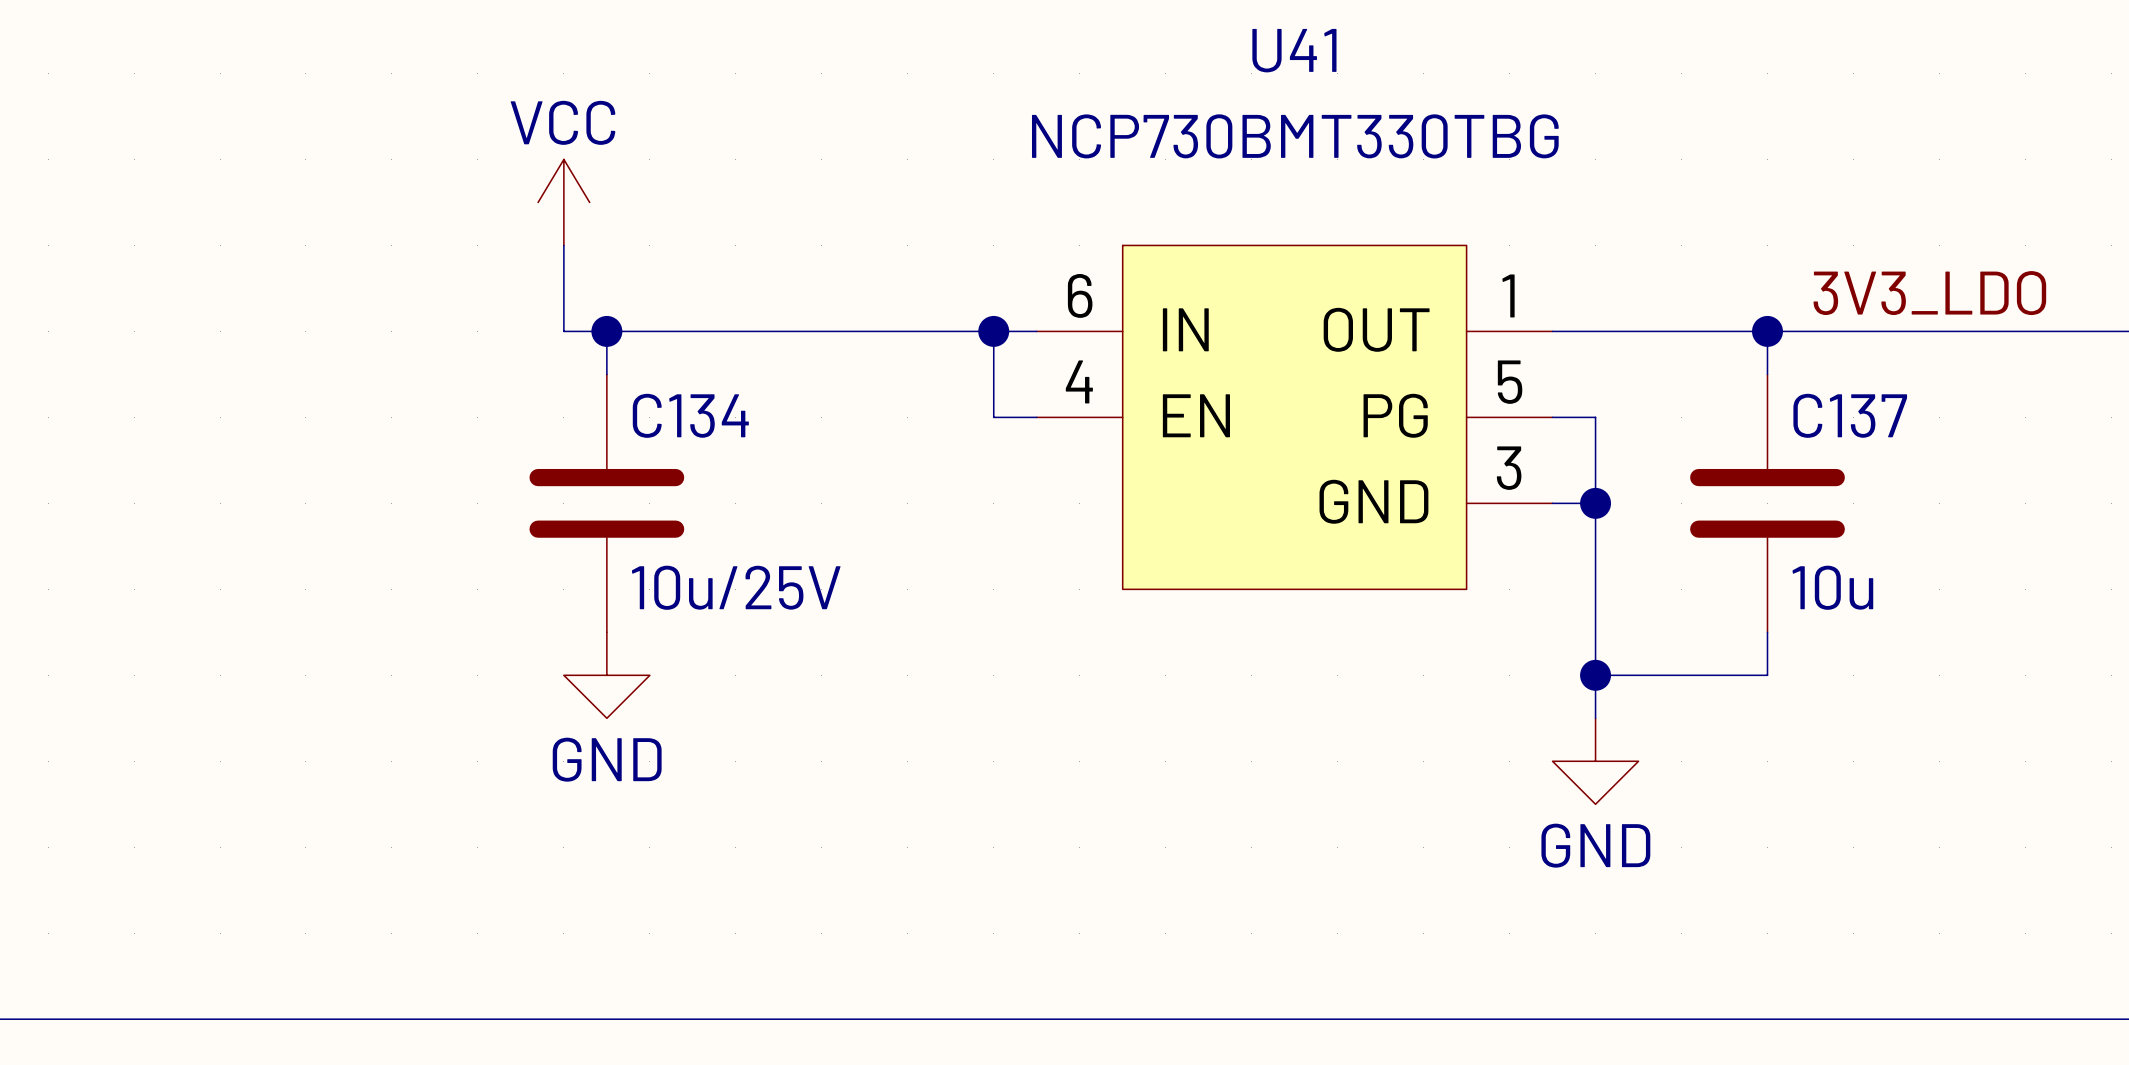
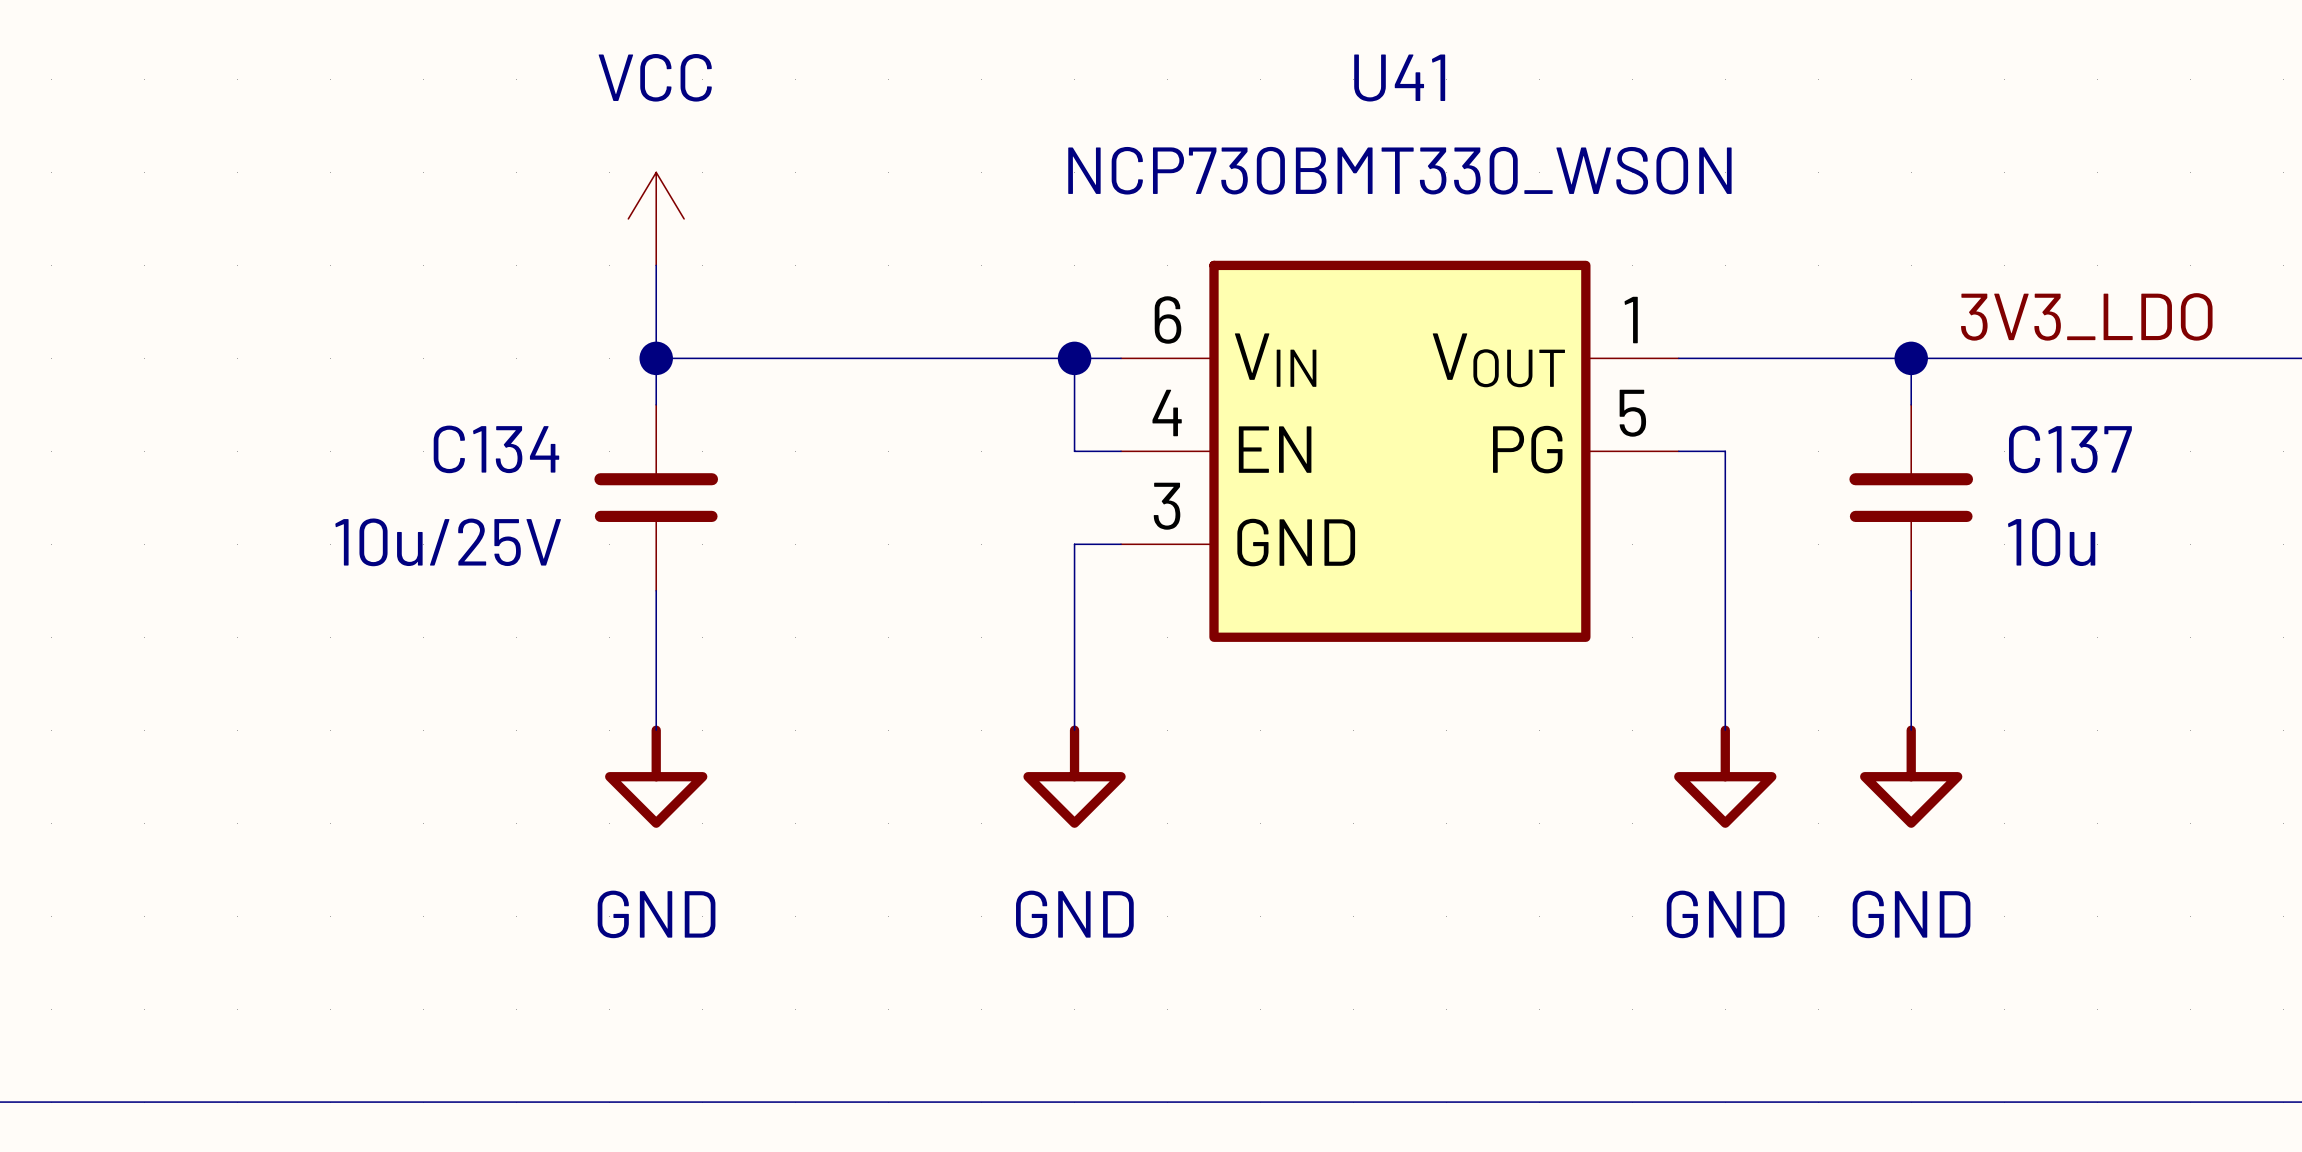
power symbol text position: VCC (562, 122) -> VCC (655, 77)
U41 value: NCP730BMT330TBG (1295, 136) -> NCP730BMT330_WSON (1399, 170)
power symbol position: VCC (563, 202) -> VCC (656, 218)
wire: (563, 245) (563, 331) (606, 331) -> (656, 265) (656, 358)
U41 symbol: [1036, 245, 1553, 590] -> [1121, 260, 1679, 642]
C134 symbol: [529, 374, 685, 633] -> [594, 404, 719, 591]
C137 symbol: [1690, 374, 1845, 633] -> [1849, 404, 1974, 591]
C134 name position: C134 (690, 415) -> C134 (496, 449)
C137 name position: C137 (1850, 415) -> C137 (2070, 449)
wire: none -> (1121, 544) (1074, 544) (1074, 730)
wire: (1552, 503) (1595, 503) -> none
junction: (1595, 503) -> none
C134 text position: 10u/25V (736, 587) -> 10u/25V (448, 542)
C137 text position: 10u (1832, 587) -> 10u (2051, 542)
power symbol: GND (606, 675) -> none
junction: (1595, 675) -> none
wire: (1767, 675) (1595, 675) (1595, 718) -> none
power symbol: none -> GND (656, 776)
power symbol: none -> GND (1074, 776)
power symbol: none -> GND (1725, 776)
power symbol: none -> GND (1911, 776)
power symbol: GND (1595, 761) -> none

